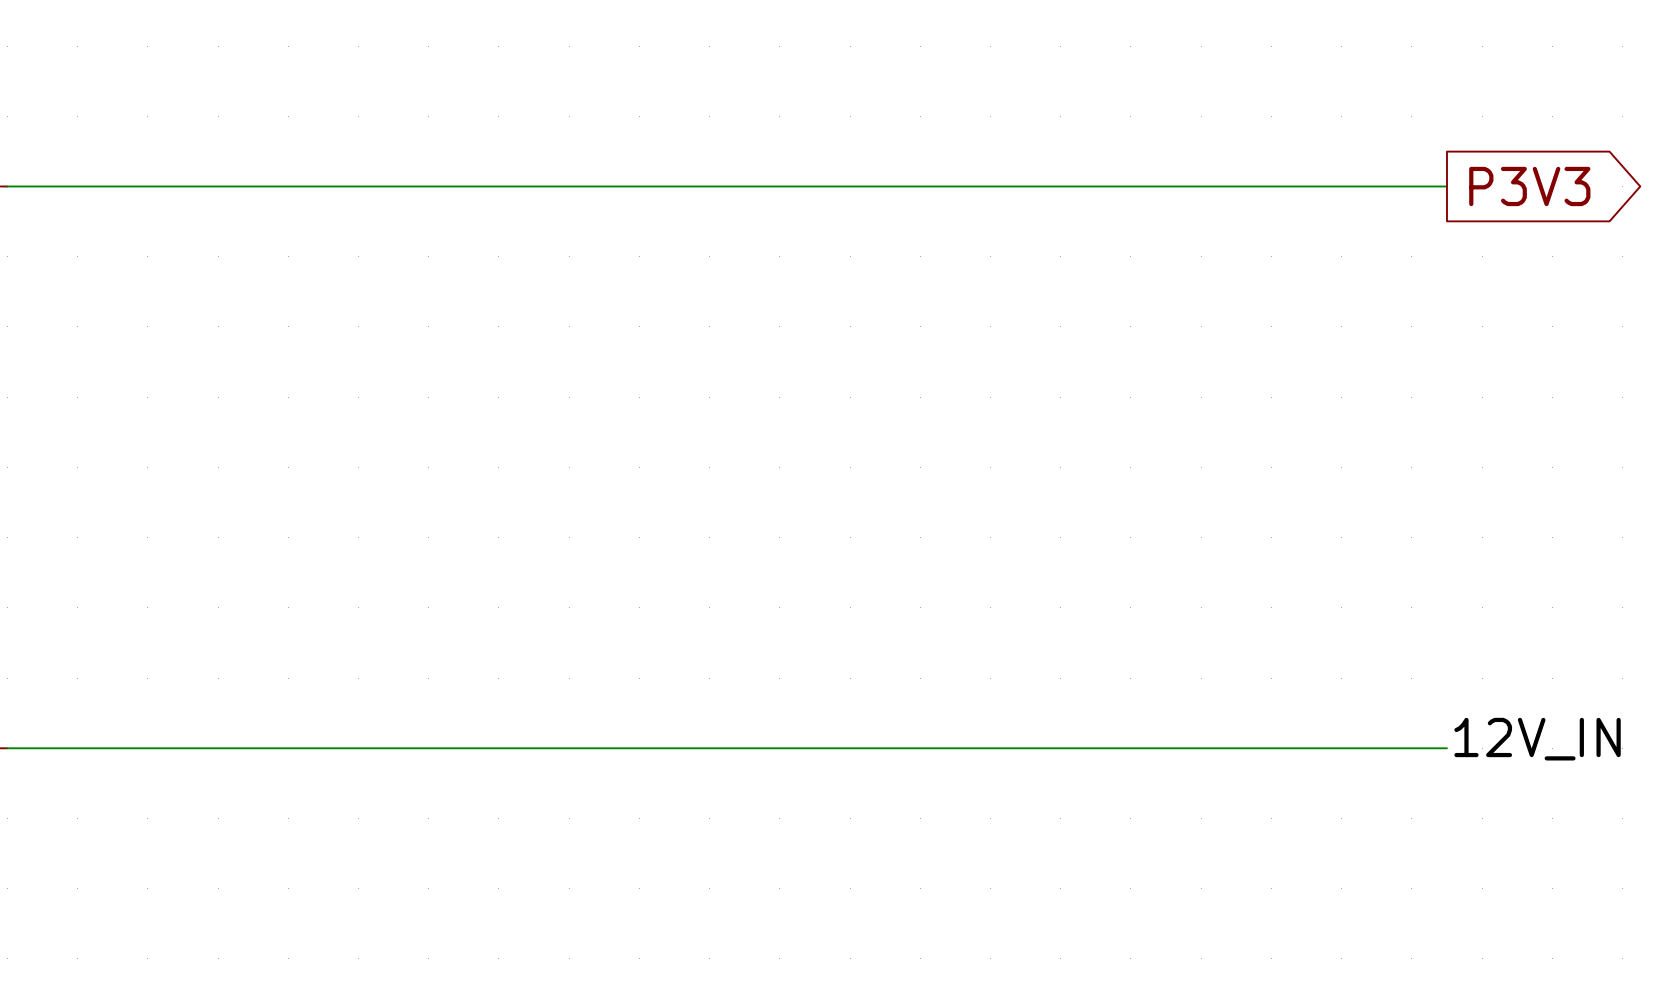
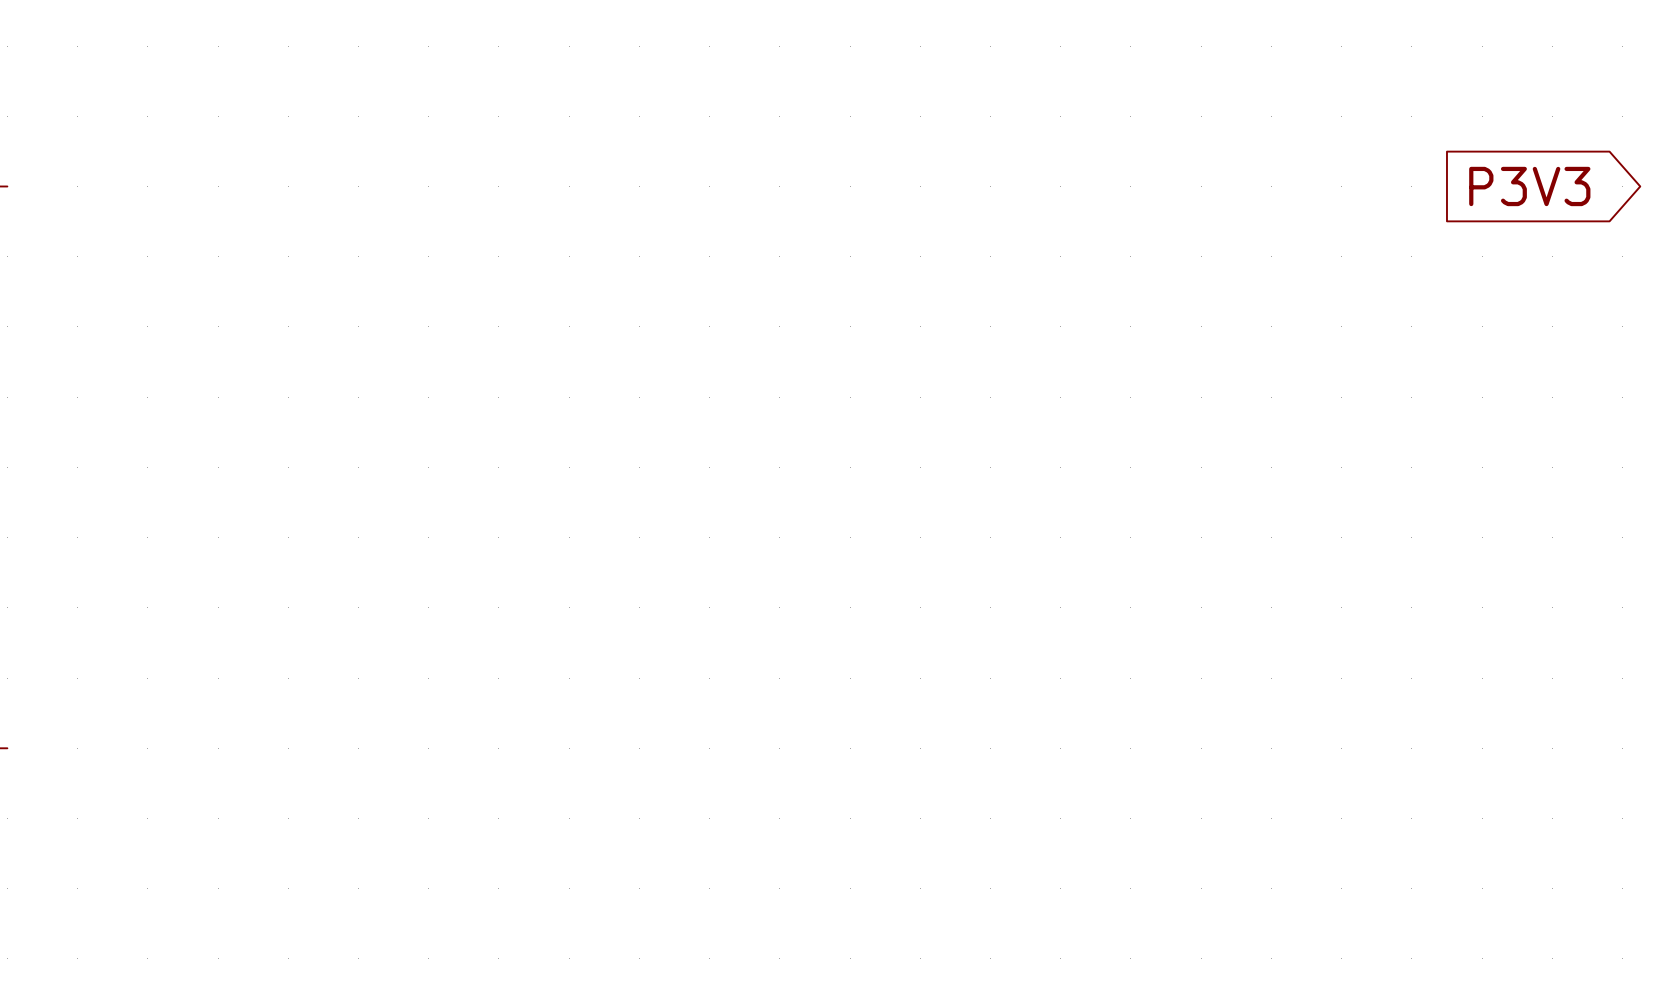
wire: (7, 186) (1446, 186) -> none
label: 12V_IN (1537, 739) -> none
wire: (7, 748) (1446, 748) -> none

